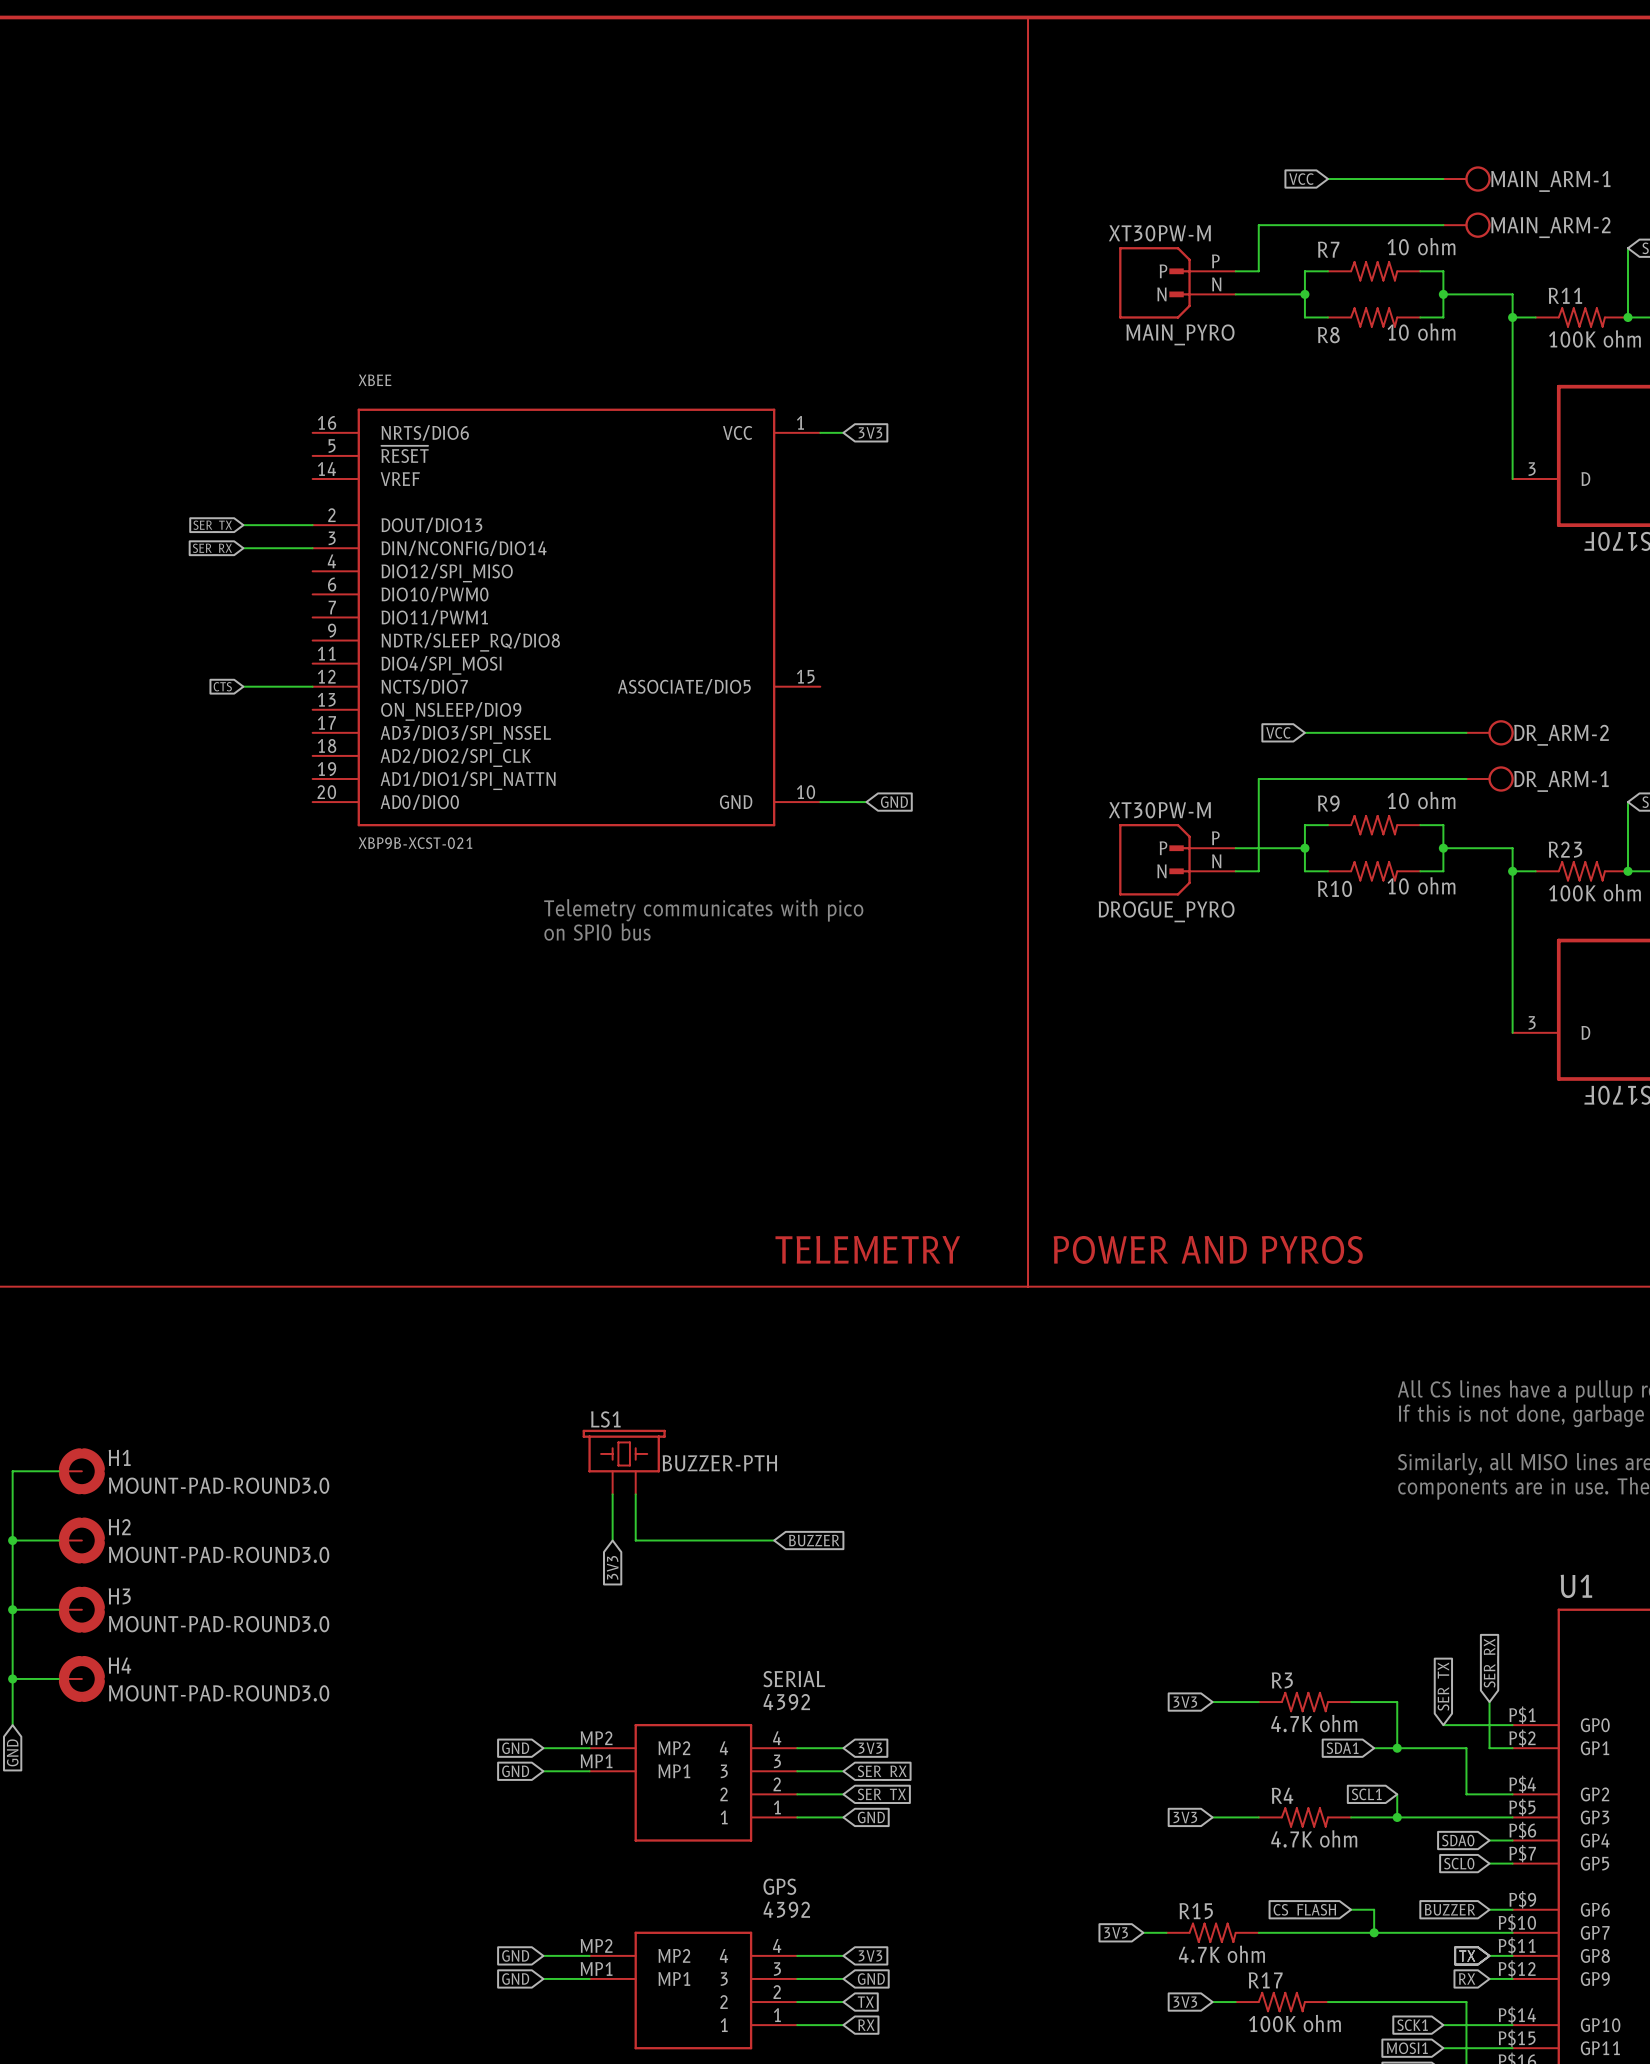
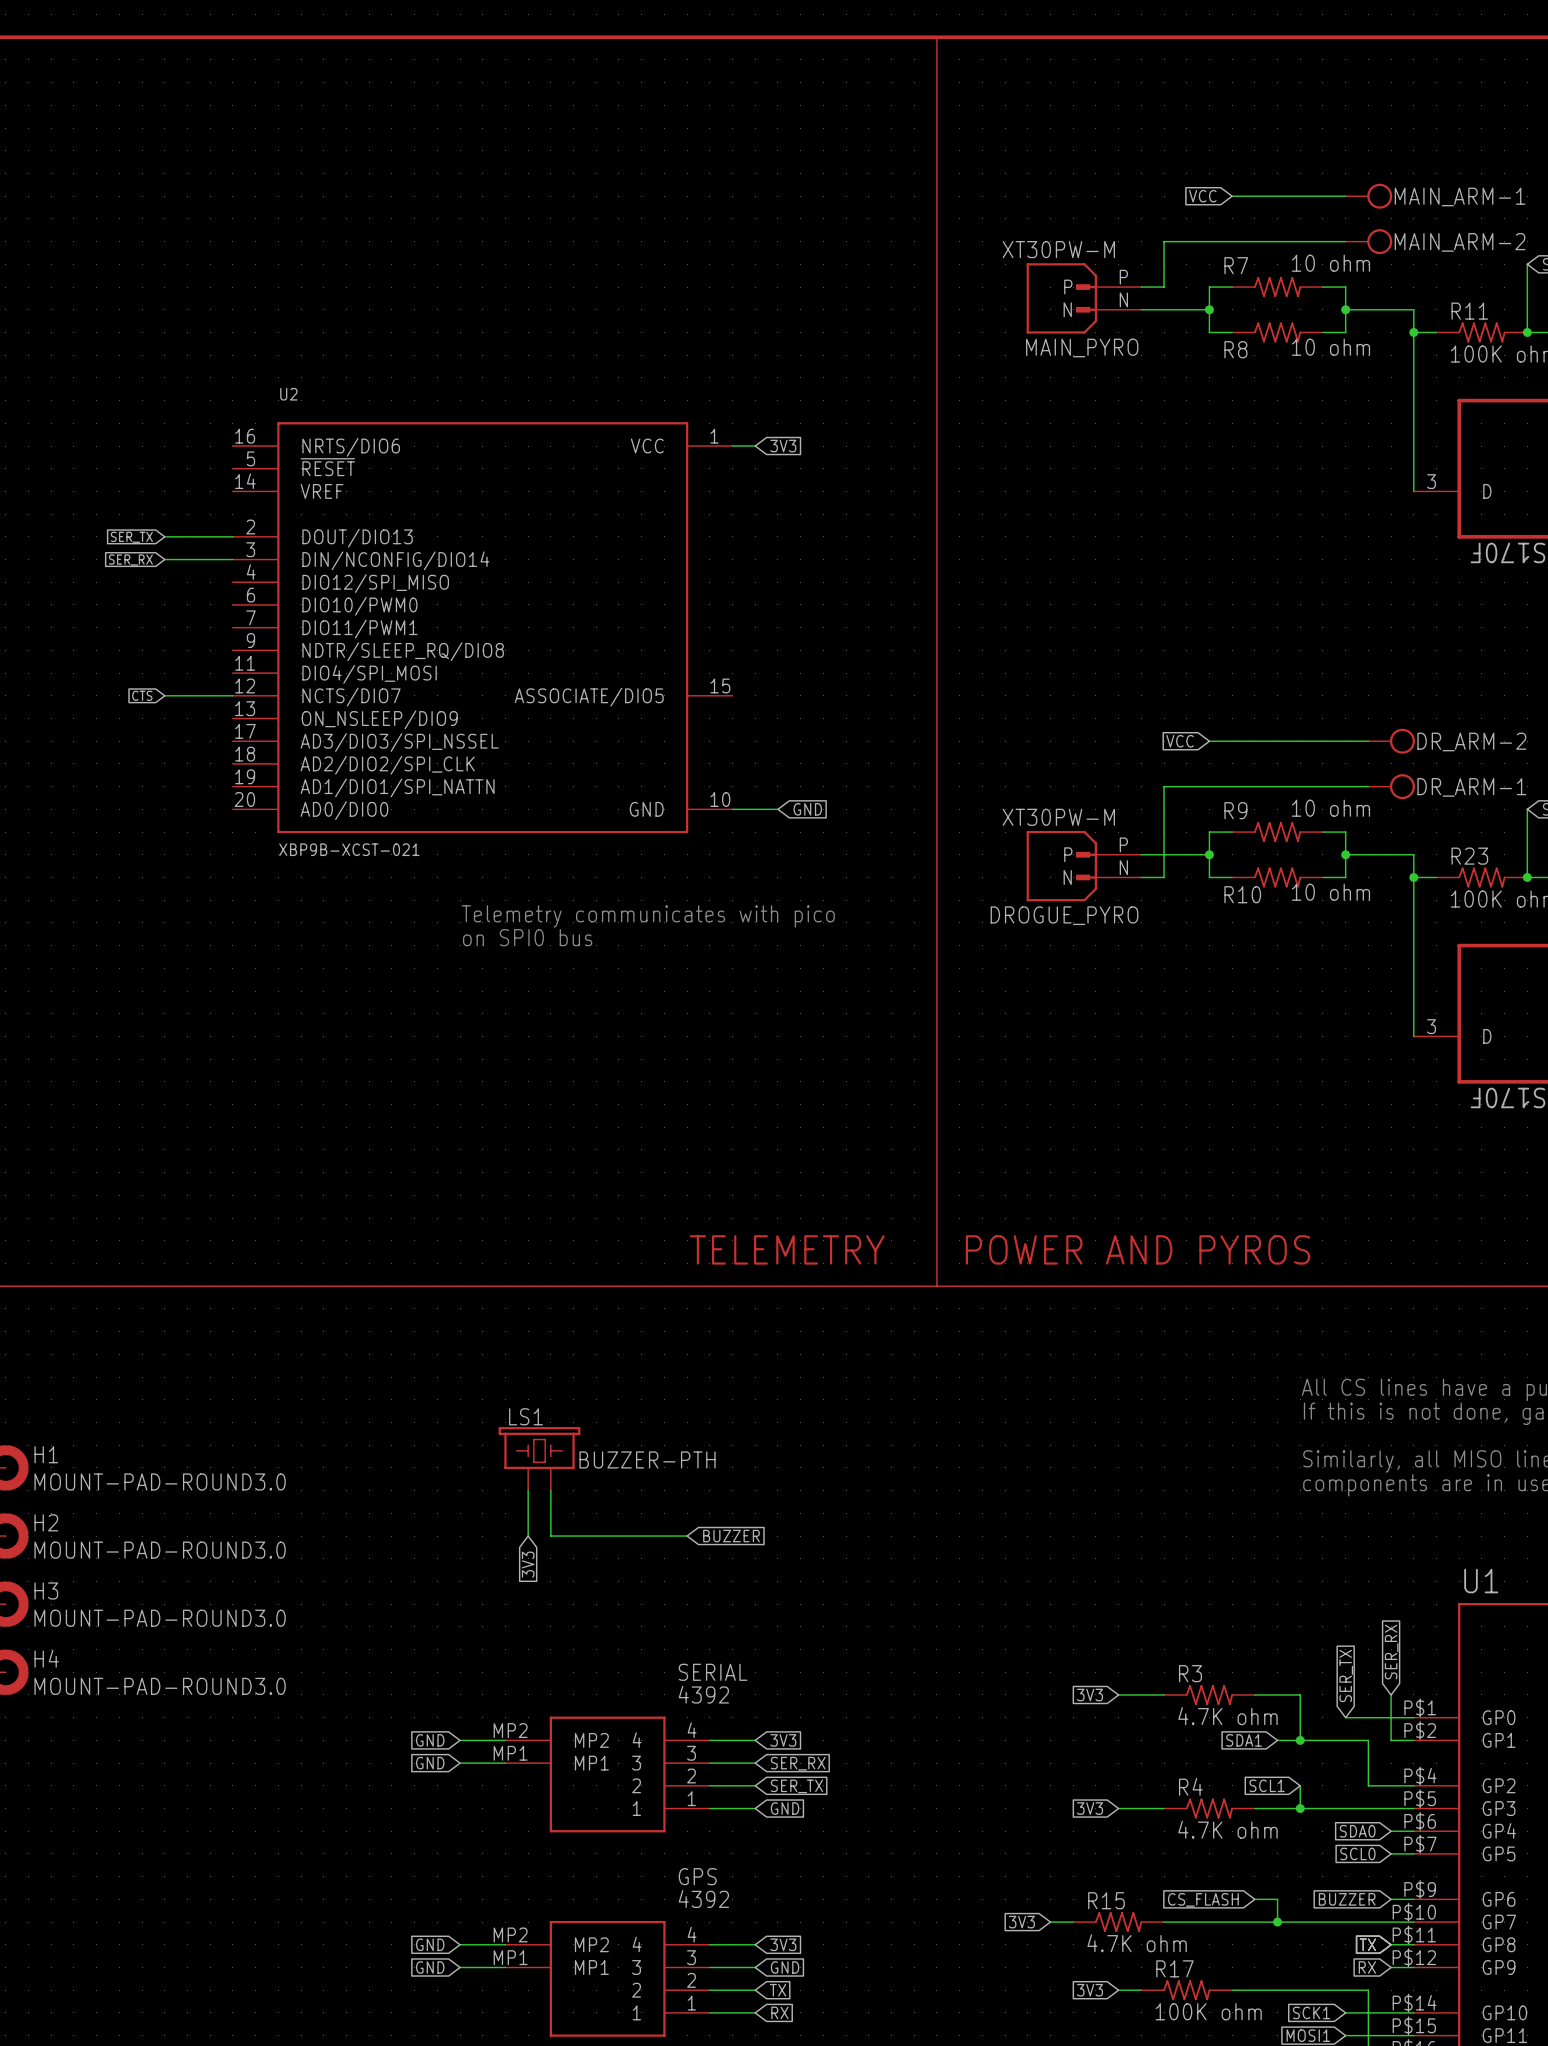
XBEE name: XBEE (374, 380) -> U2 (288, 394)

